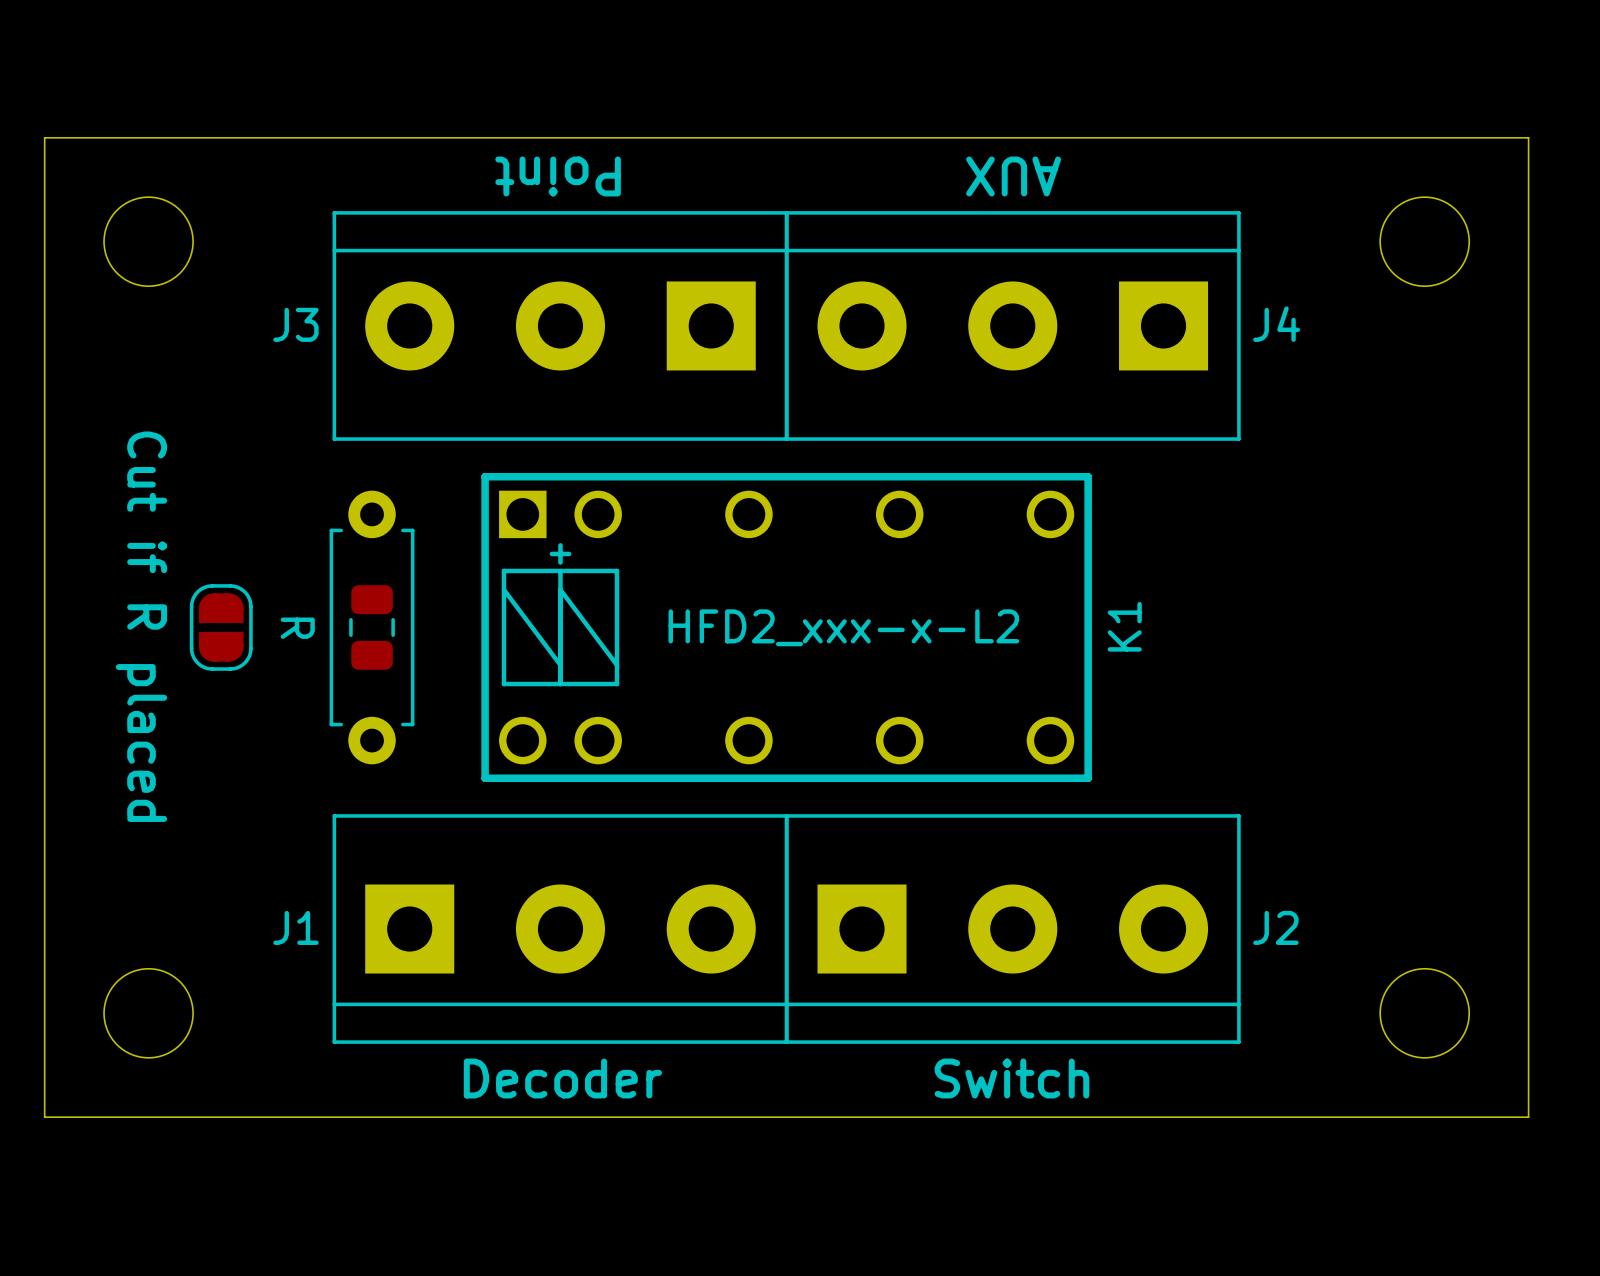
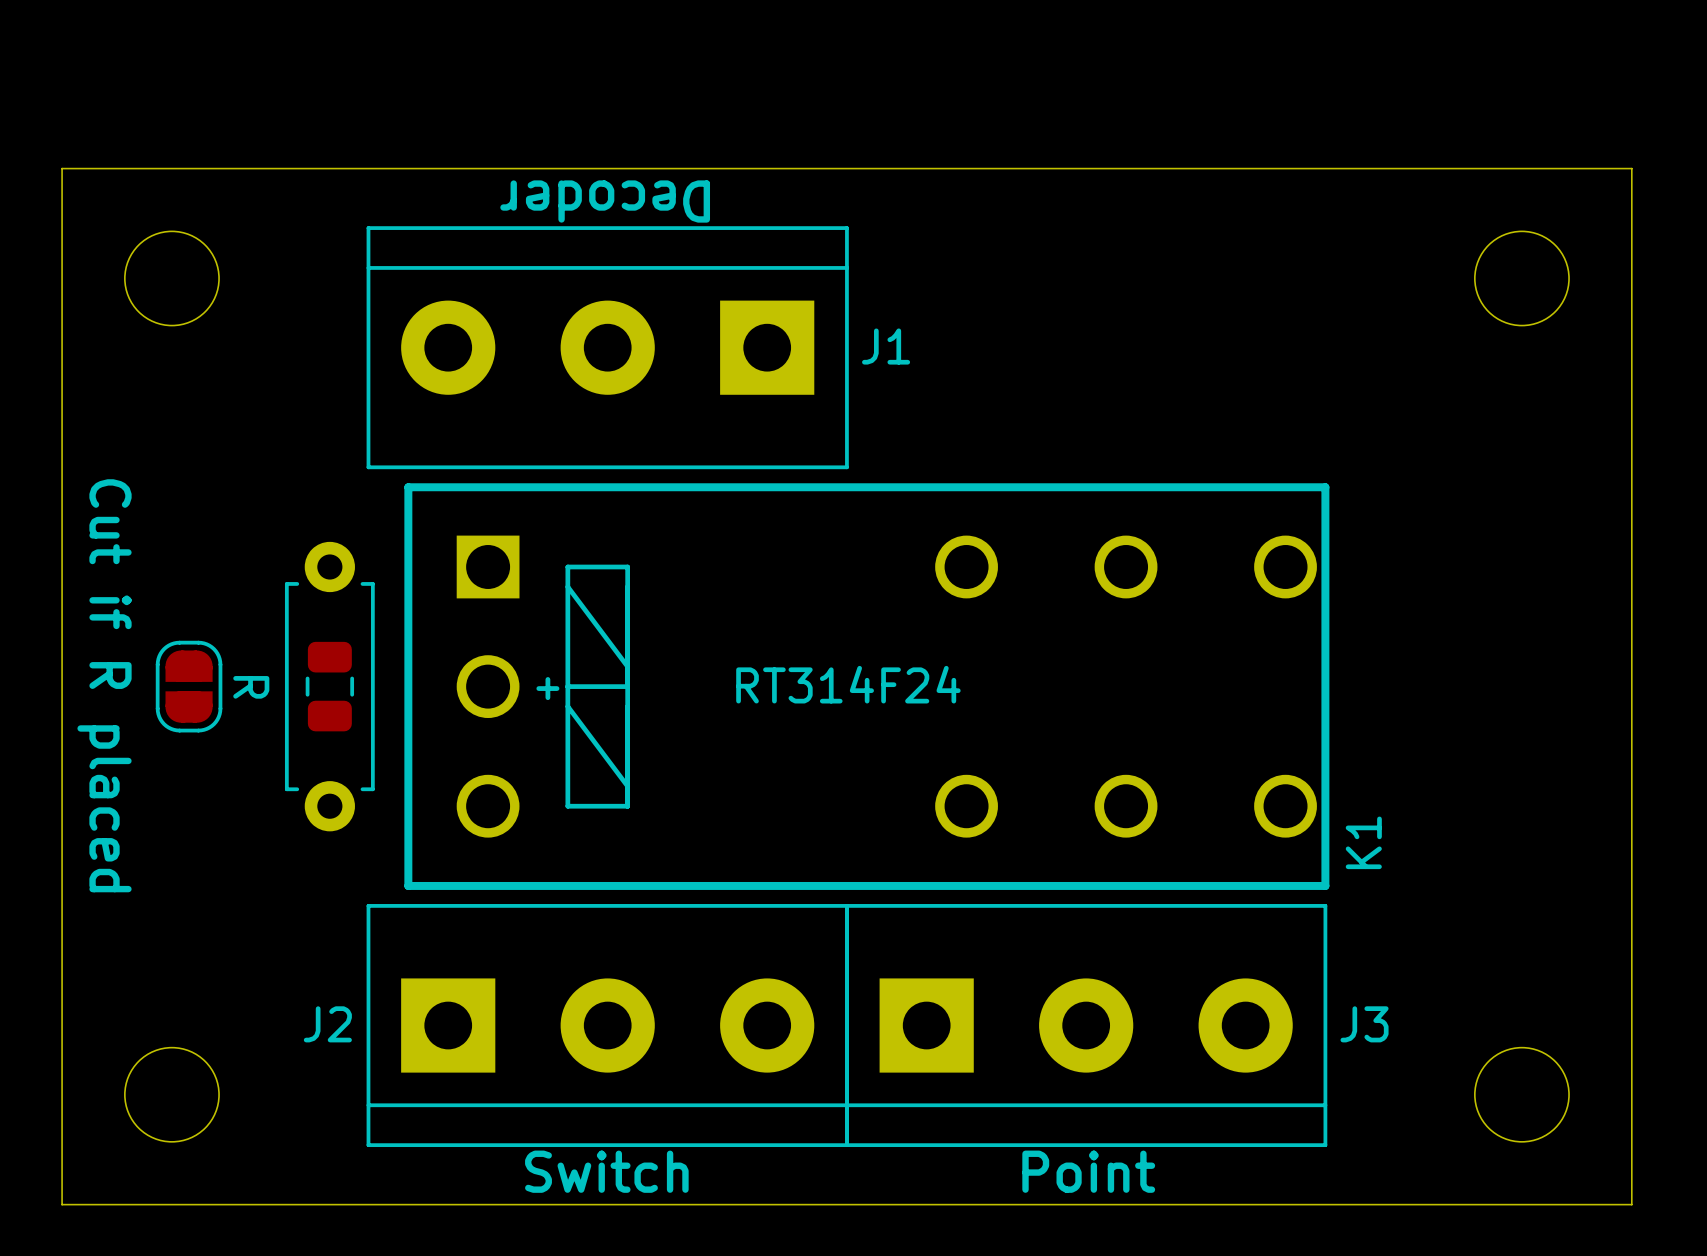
J3 rotation: 0° (560, 325) -> 180° (1086, 1025)
J3 position: (560, 325) -> (1086, 1025)
J4: AUX (1012, 325) -> none
K1 footprint: [481, 472, 1092, 783] -> [404, 483, 1330, 890]
text position: Cut if R placed (141, 626) -> Cut if R placed (104, 685)
K1 name position: K1 (1124, 626) -> K1 (1363, 842)
part position: (221, 627) -> (189, 686)
part position: (372, 627) -> (329, 686)
part position: (372, 627) -> (329, 686)
K1 value: HFD2_xxx-x-L2 (843, 627) -> RT314F24 (848, 684)
J2 name position: J2 (1275, 927) -> J2 (327, 1024)
J1 rotation: 0° (560, 929) -> 180° (607, 347)
J1 position: (560, 929) -> (607, 347)
J2 position: (1012, 929) -> (607, 1025)
J2 value position: Switch (1011, 1078) -> Switch (606, 1171)

